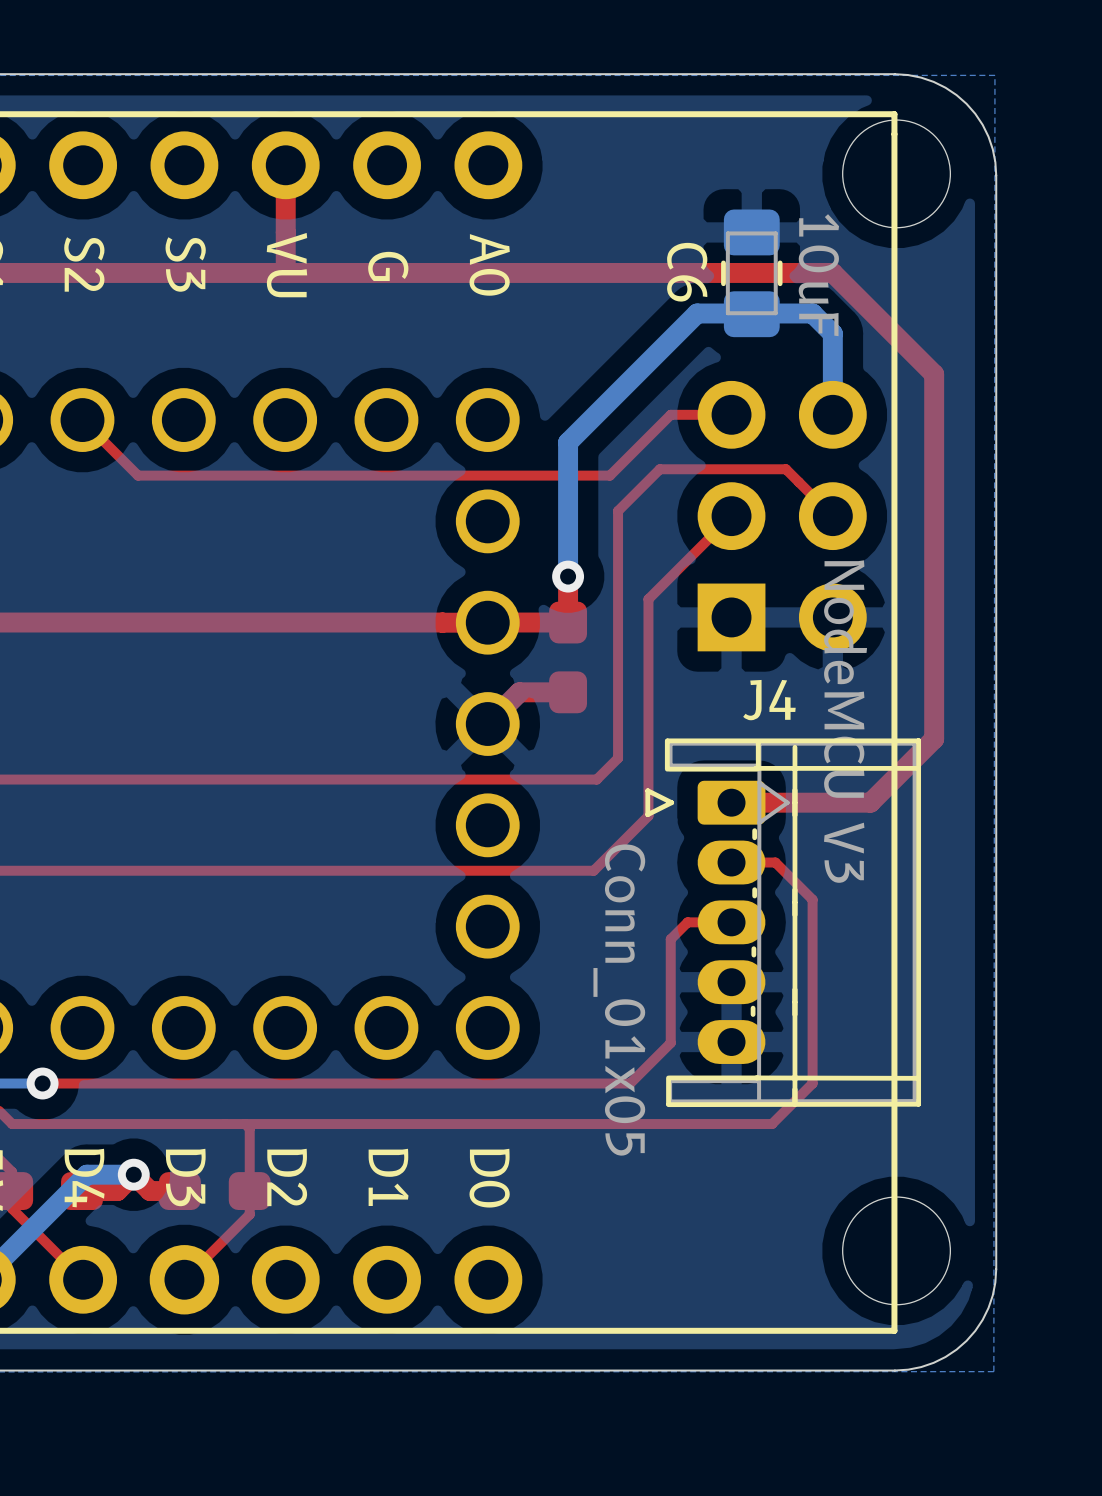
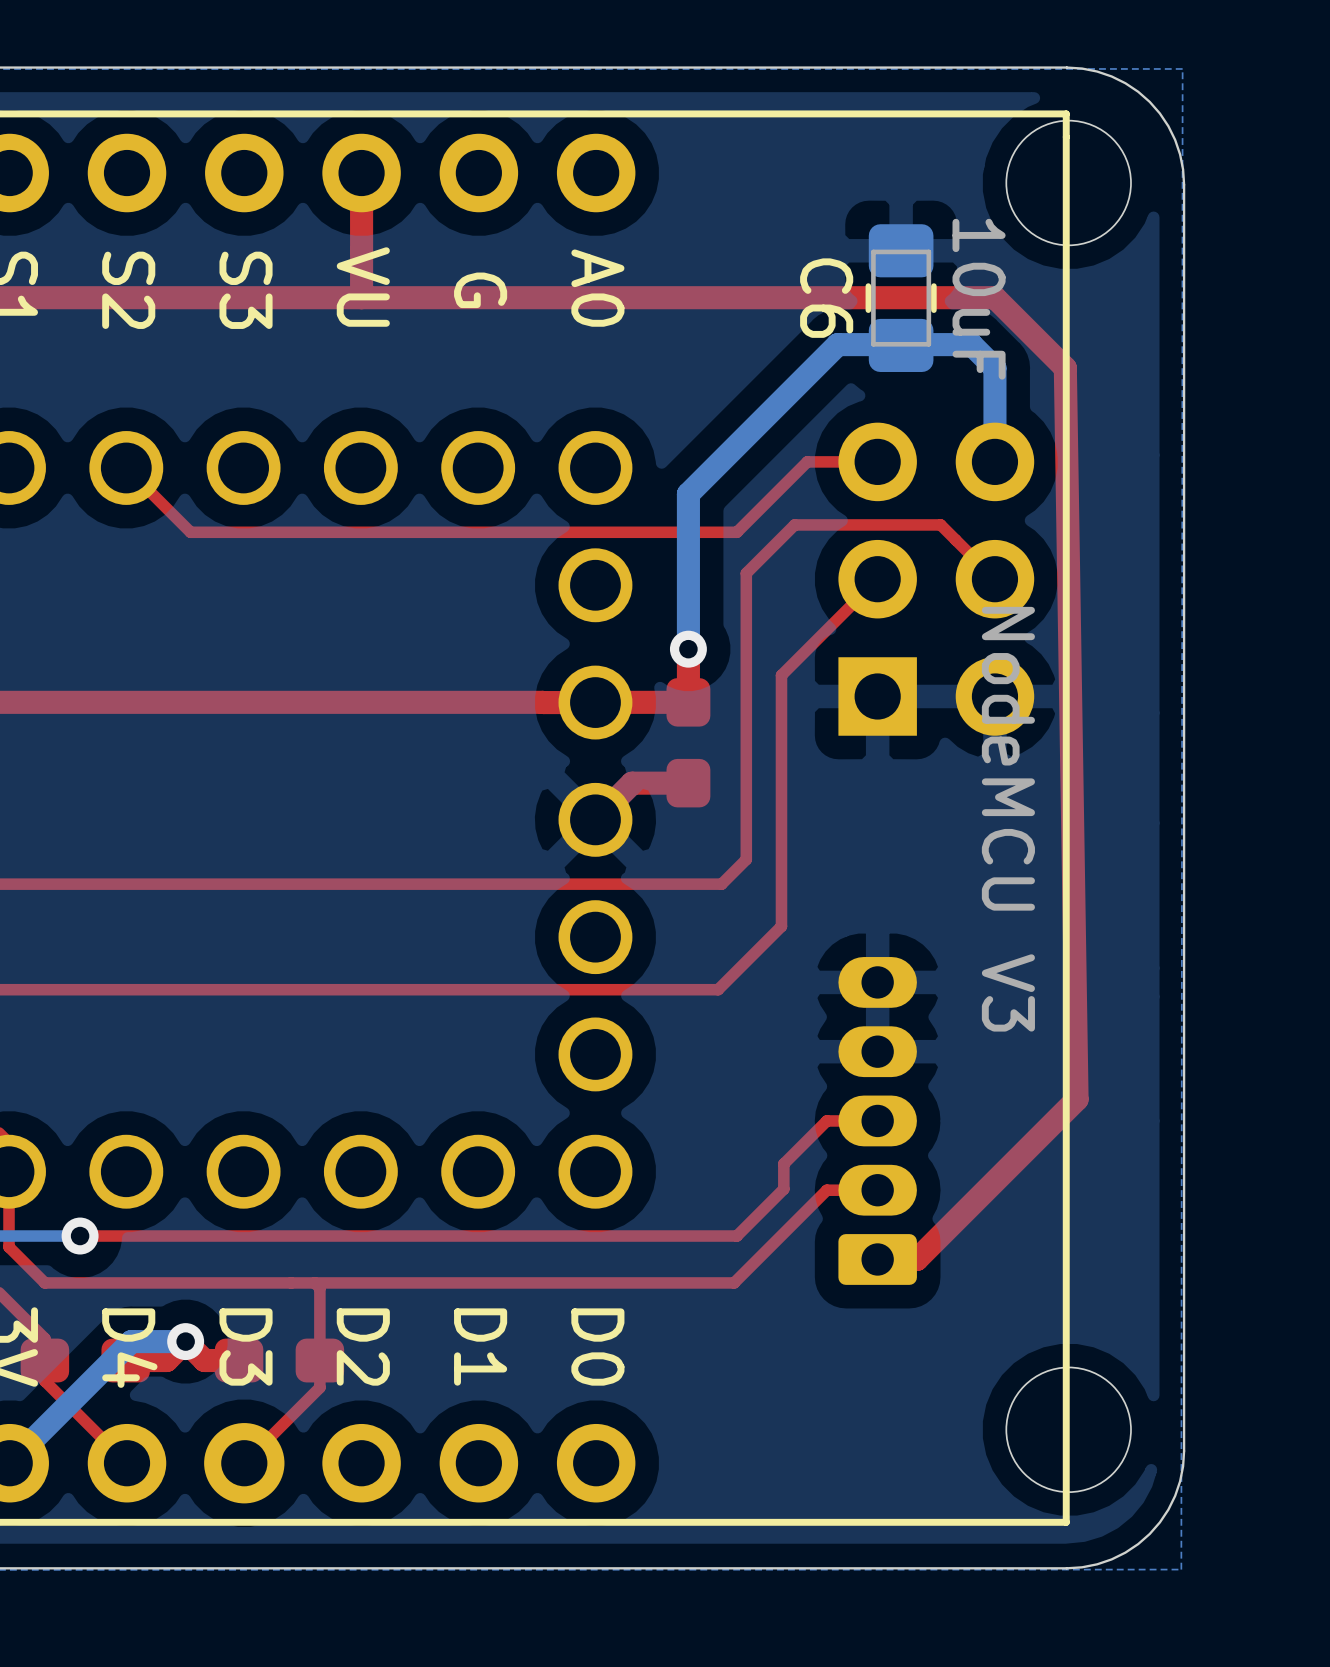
top track: (893, 333) (934, 374) (934, 739) (870, 802) (731, 802) -> (1065, 368) (1077, 1099) (916, 1259) (877, 1259)
top track: (731, 862) (775, 862) (812, 899) (812, 1083) (772, 1124) (607, 1124) -> (877, 1190) (826, 1190) (734, 1282)
top track: (731, 922) (687, 922) (670, 939) (670, 1042) (630, 1083) (609, 1083) -> (877, 1120) (826, 1120) (783, 1163) (783, 1189) (736, 1236)
J4 side: bottom (783, 922) -> top (877, 1120)

